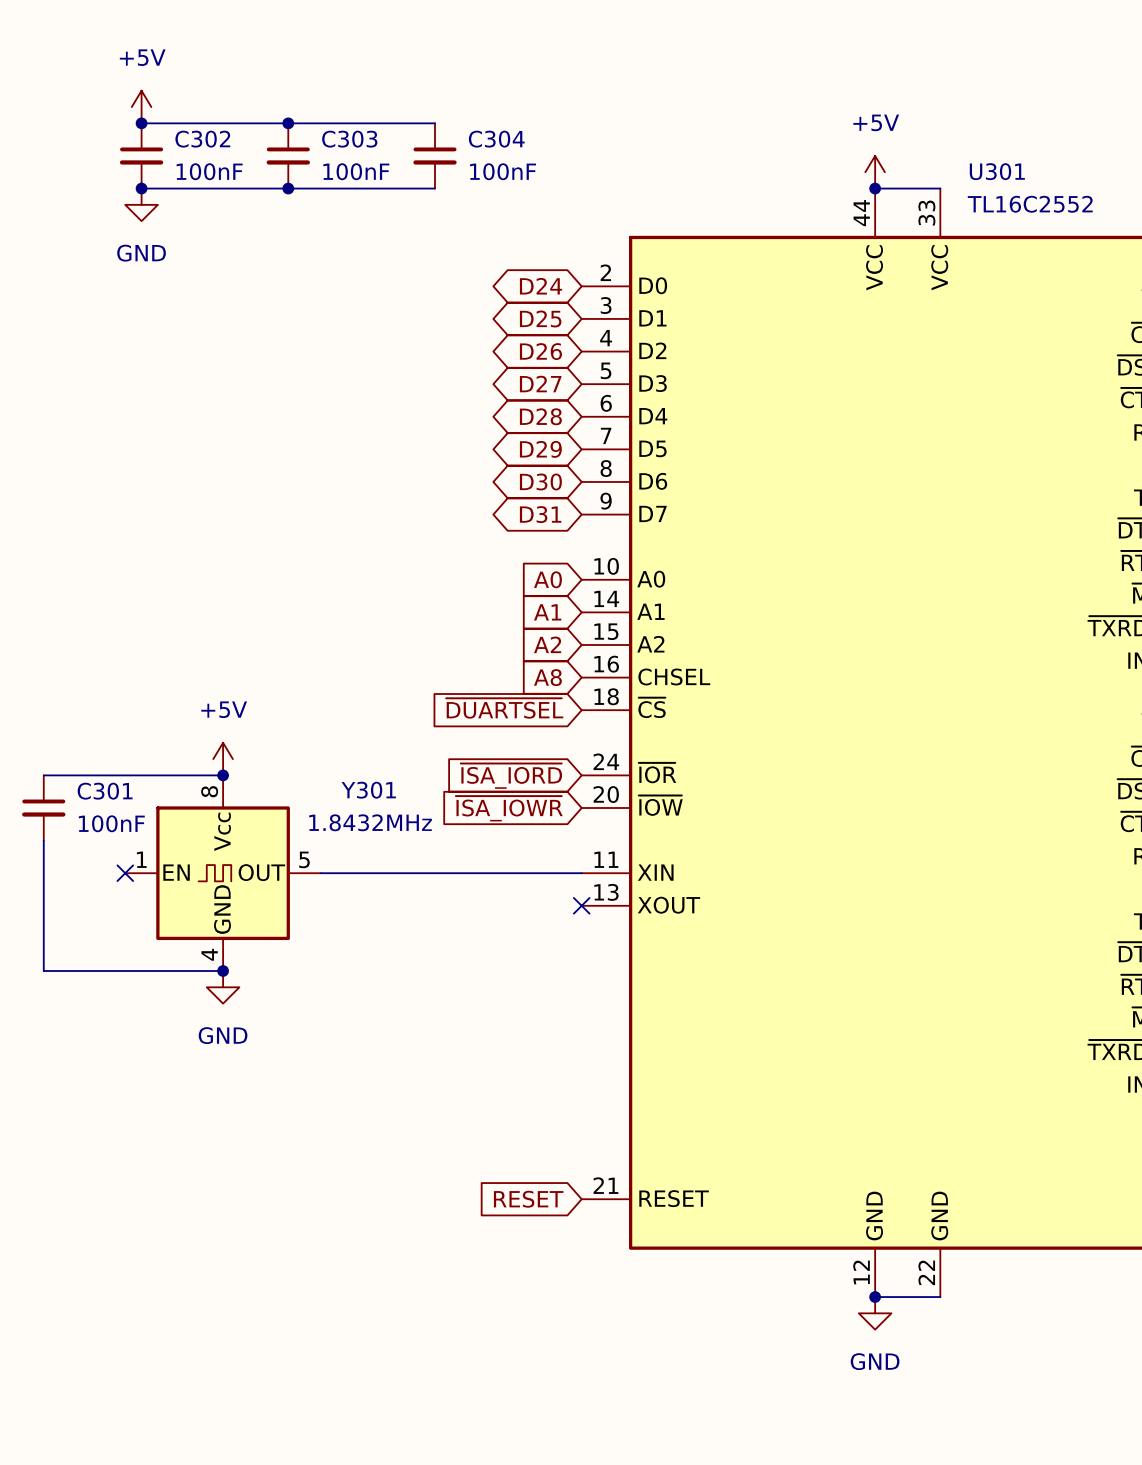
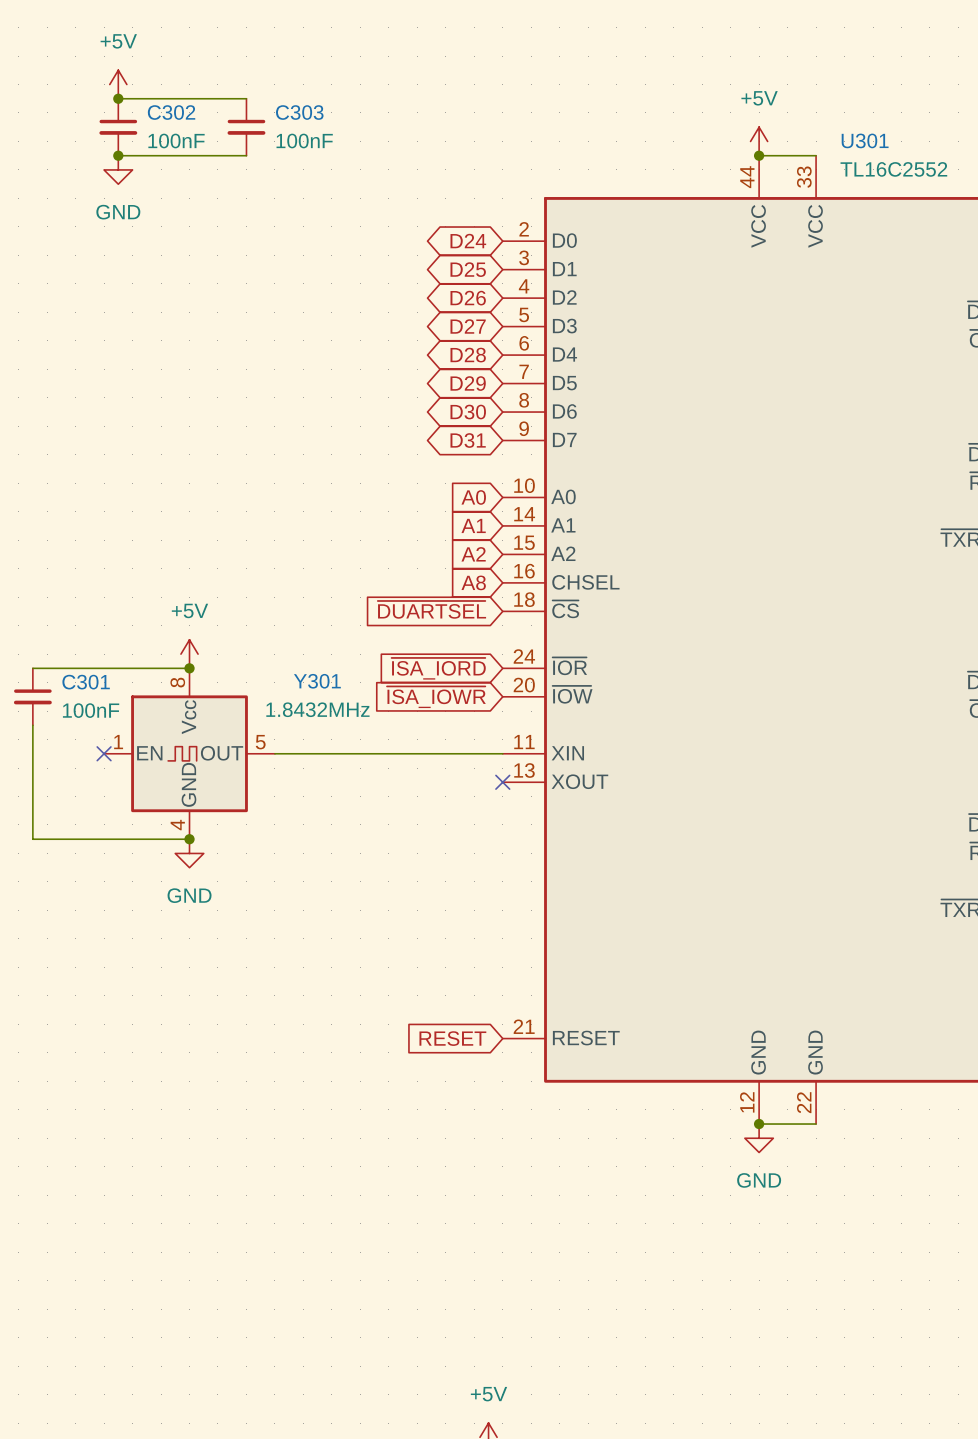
wire: (288, 123) (435, 123) -> none
junction: (288, 123) -> none
C304: 100nF (435, 155) -> none
wire: (288, 188) (435, 188) -> none
junction: (288, 188) -> none

